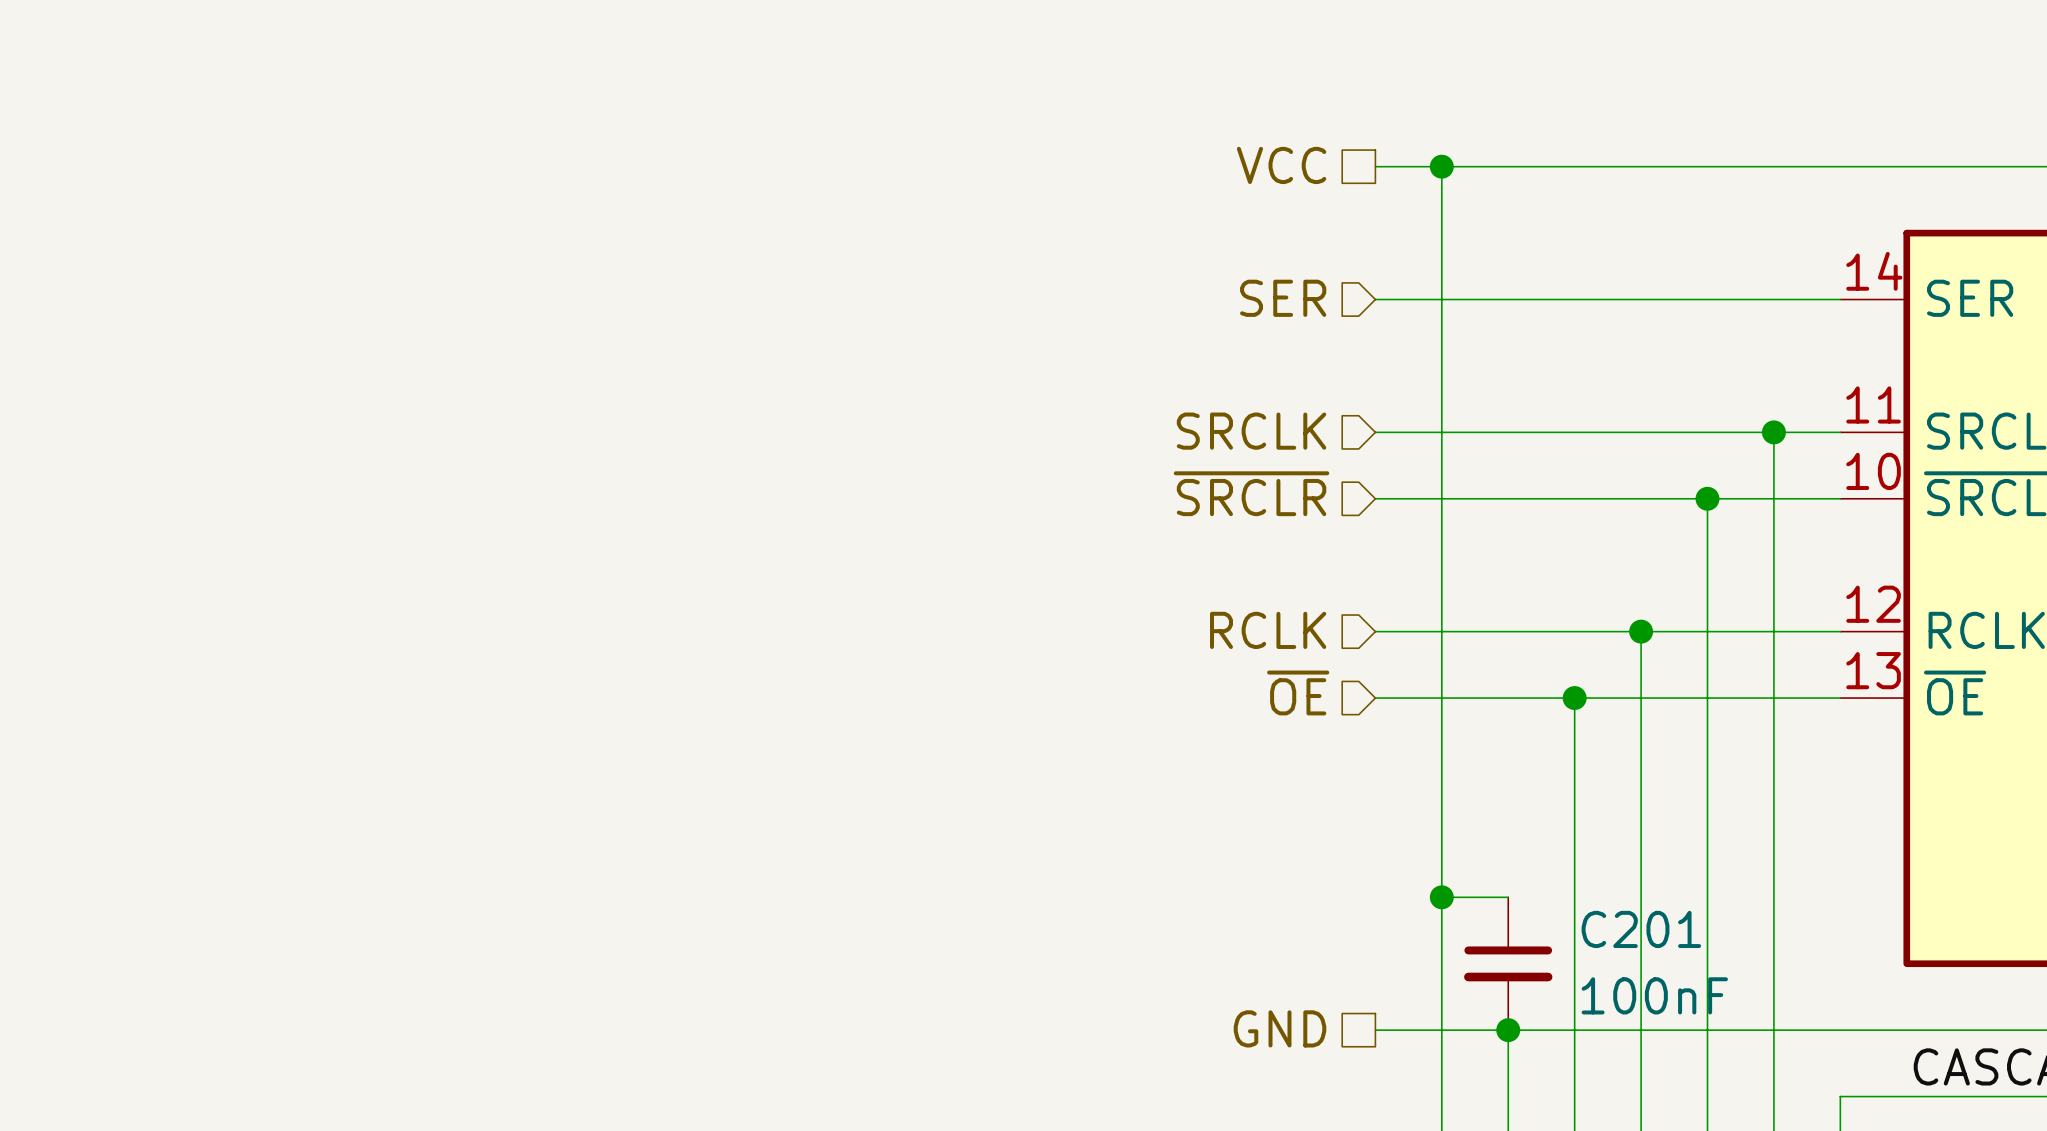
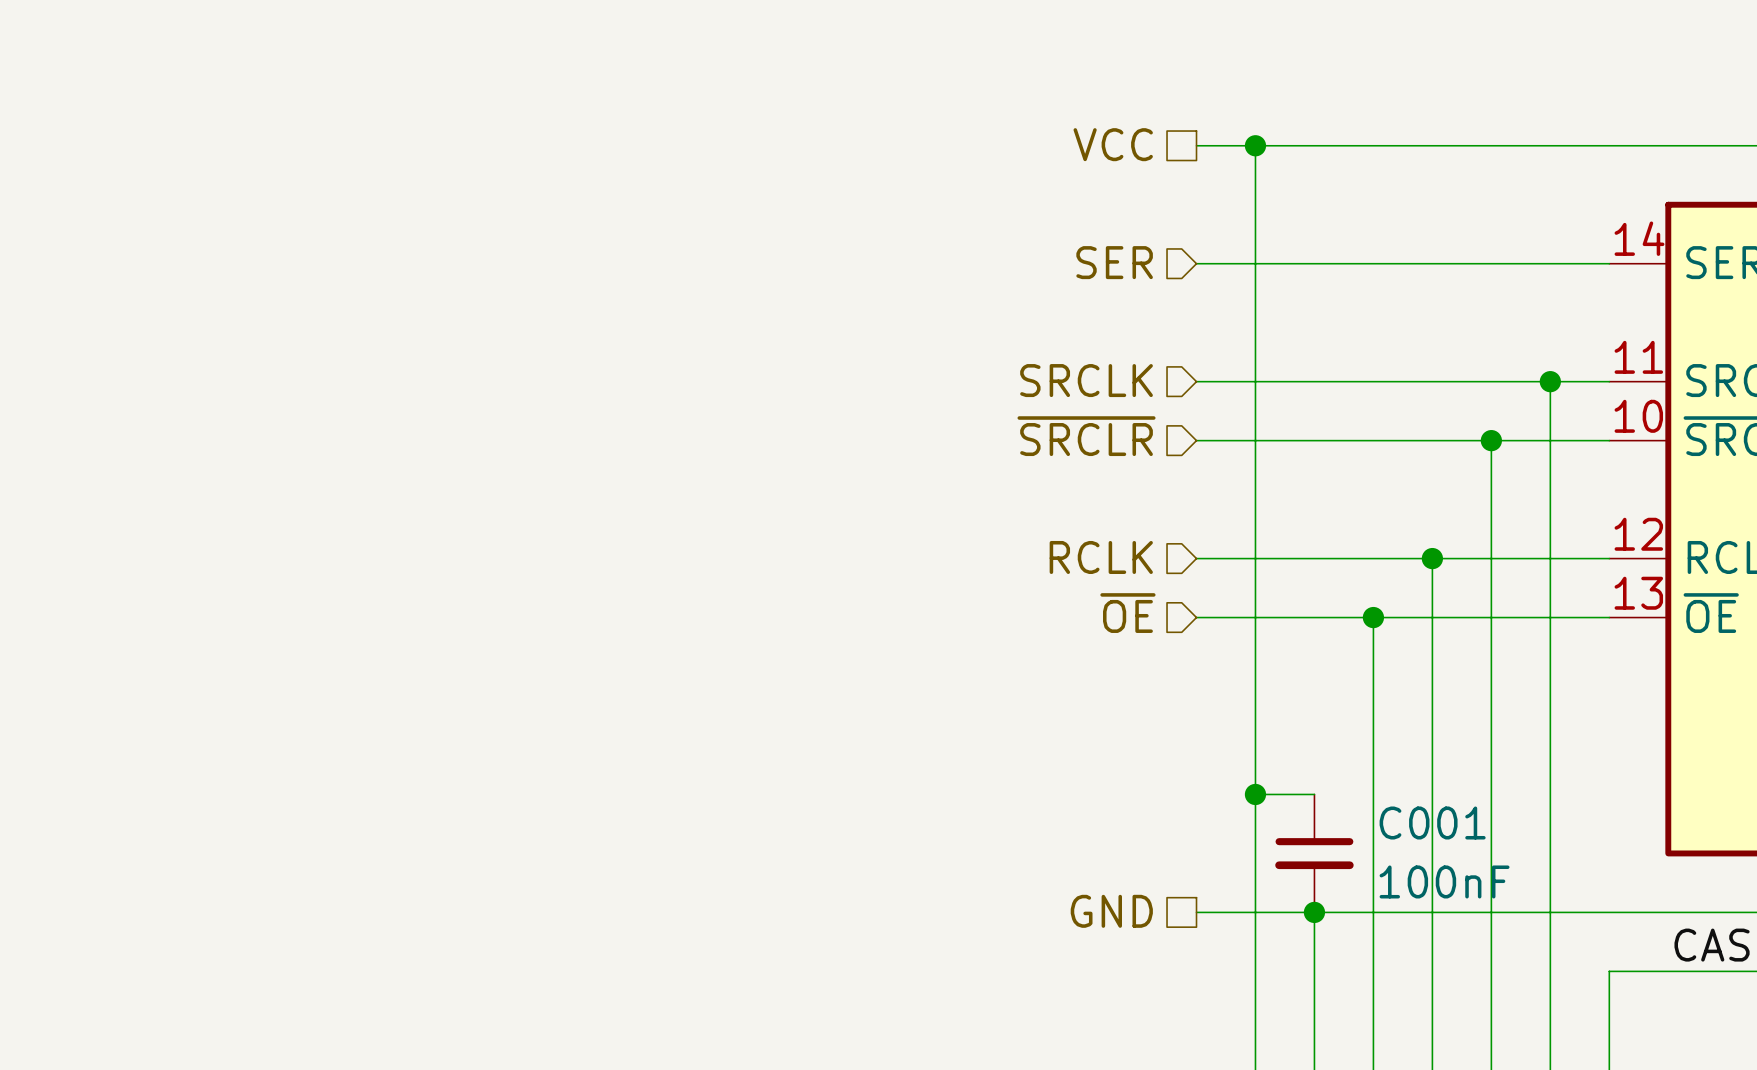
C201 name: C201 (1641, 929) -> C001 (1432, 823)

